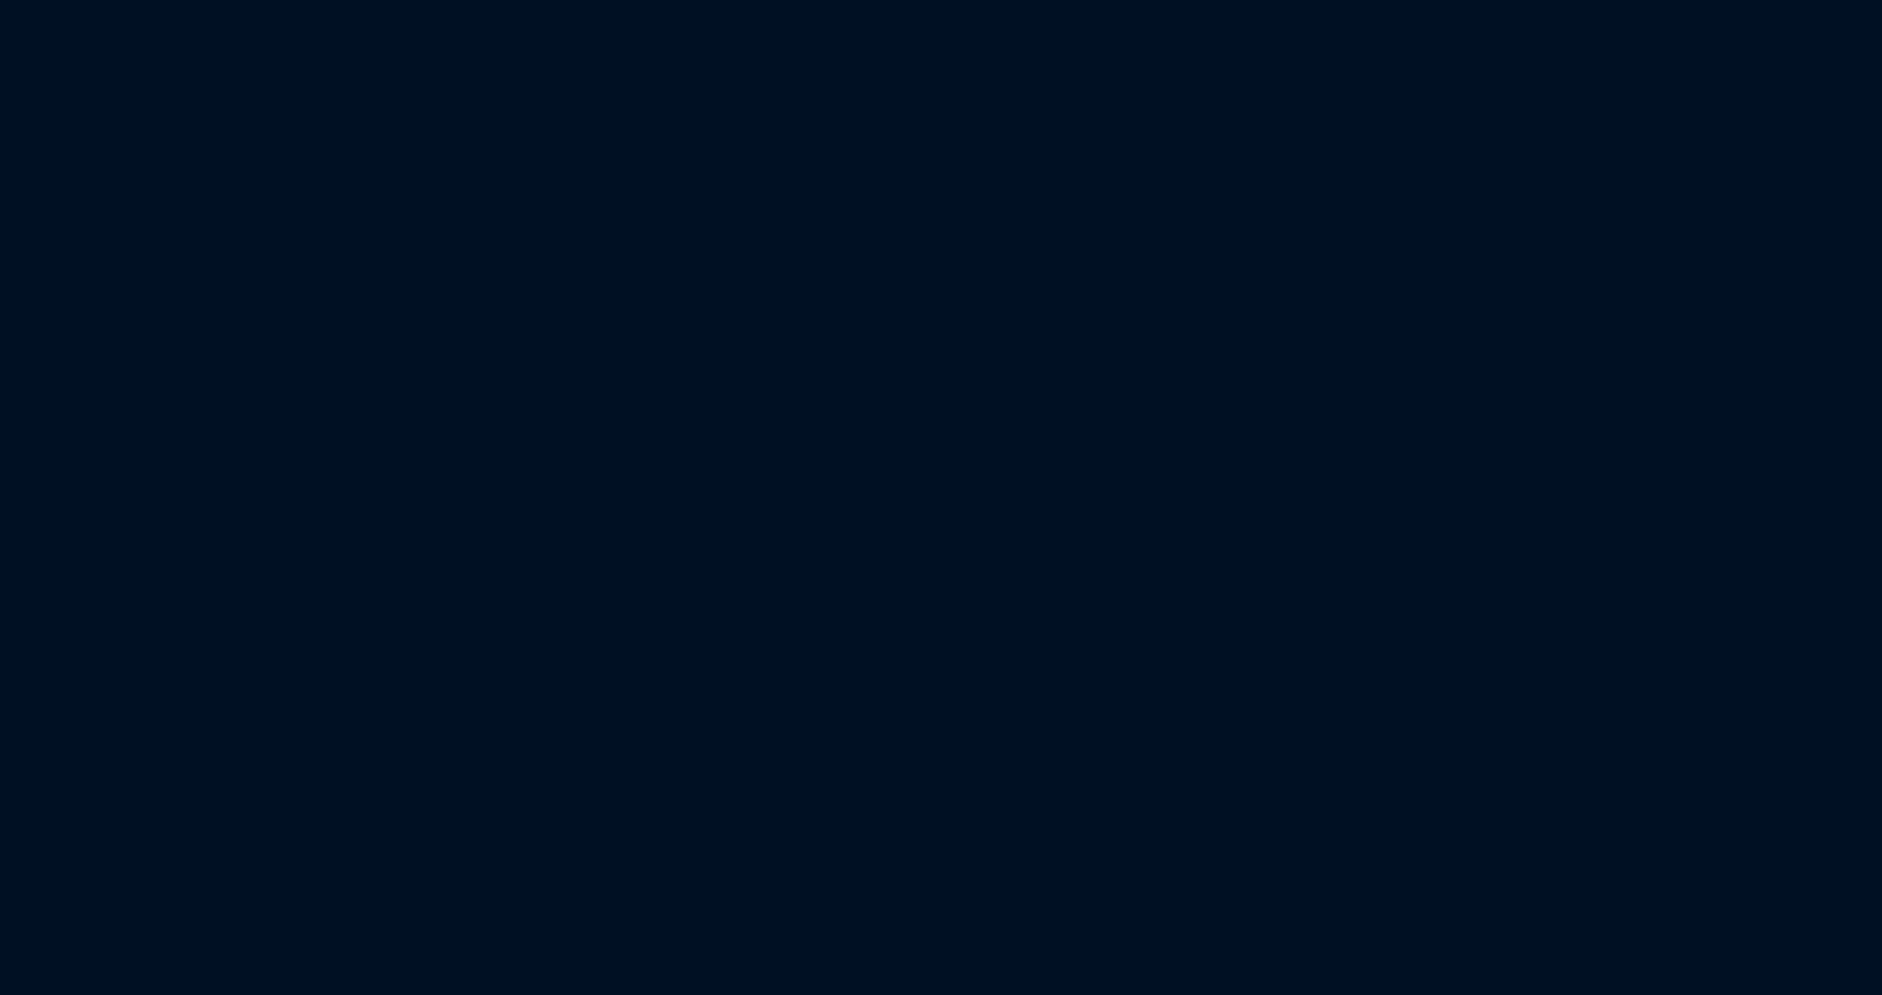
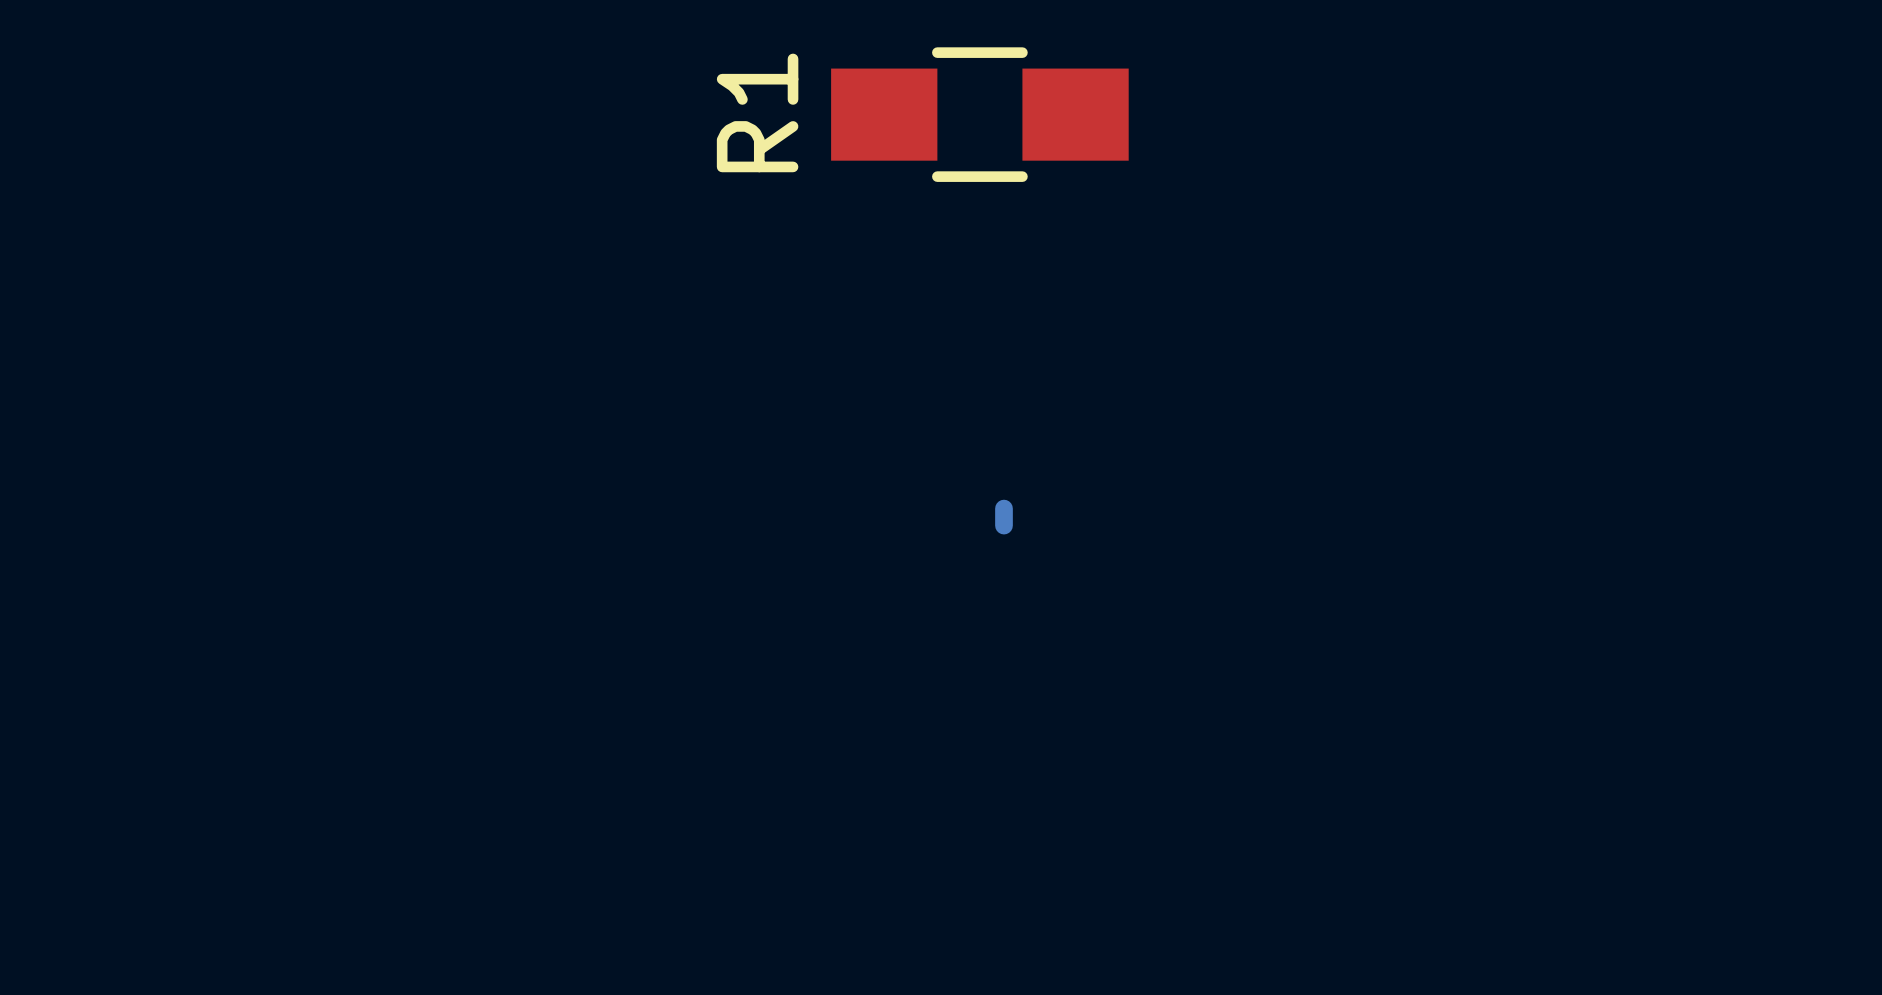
R1: none -> (979, 114)
bottom track: none -> (1003, 508) (1003, 525)

